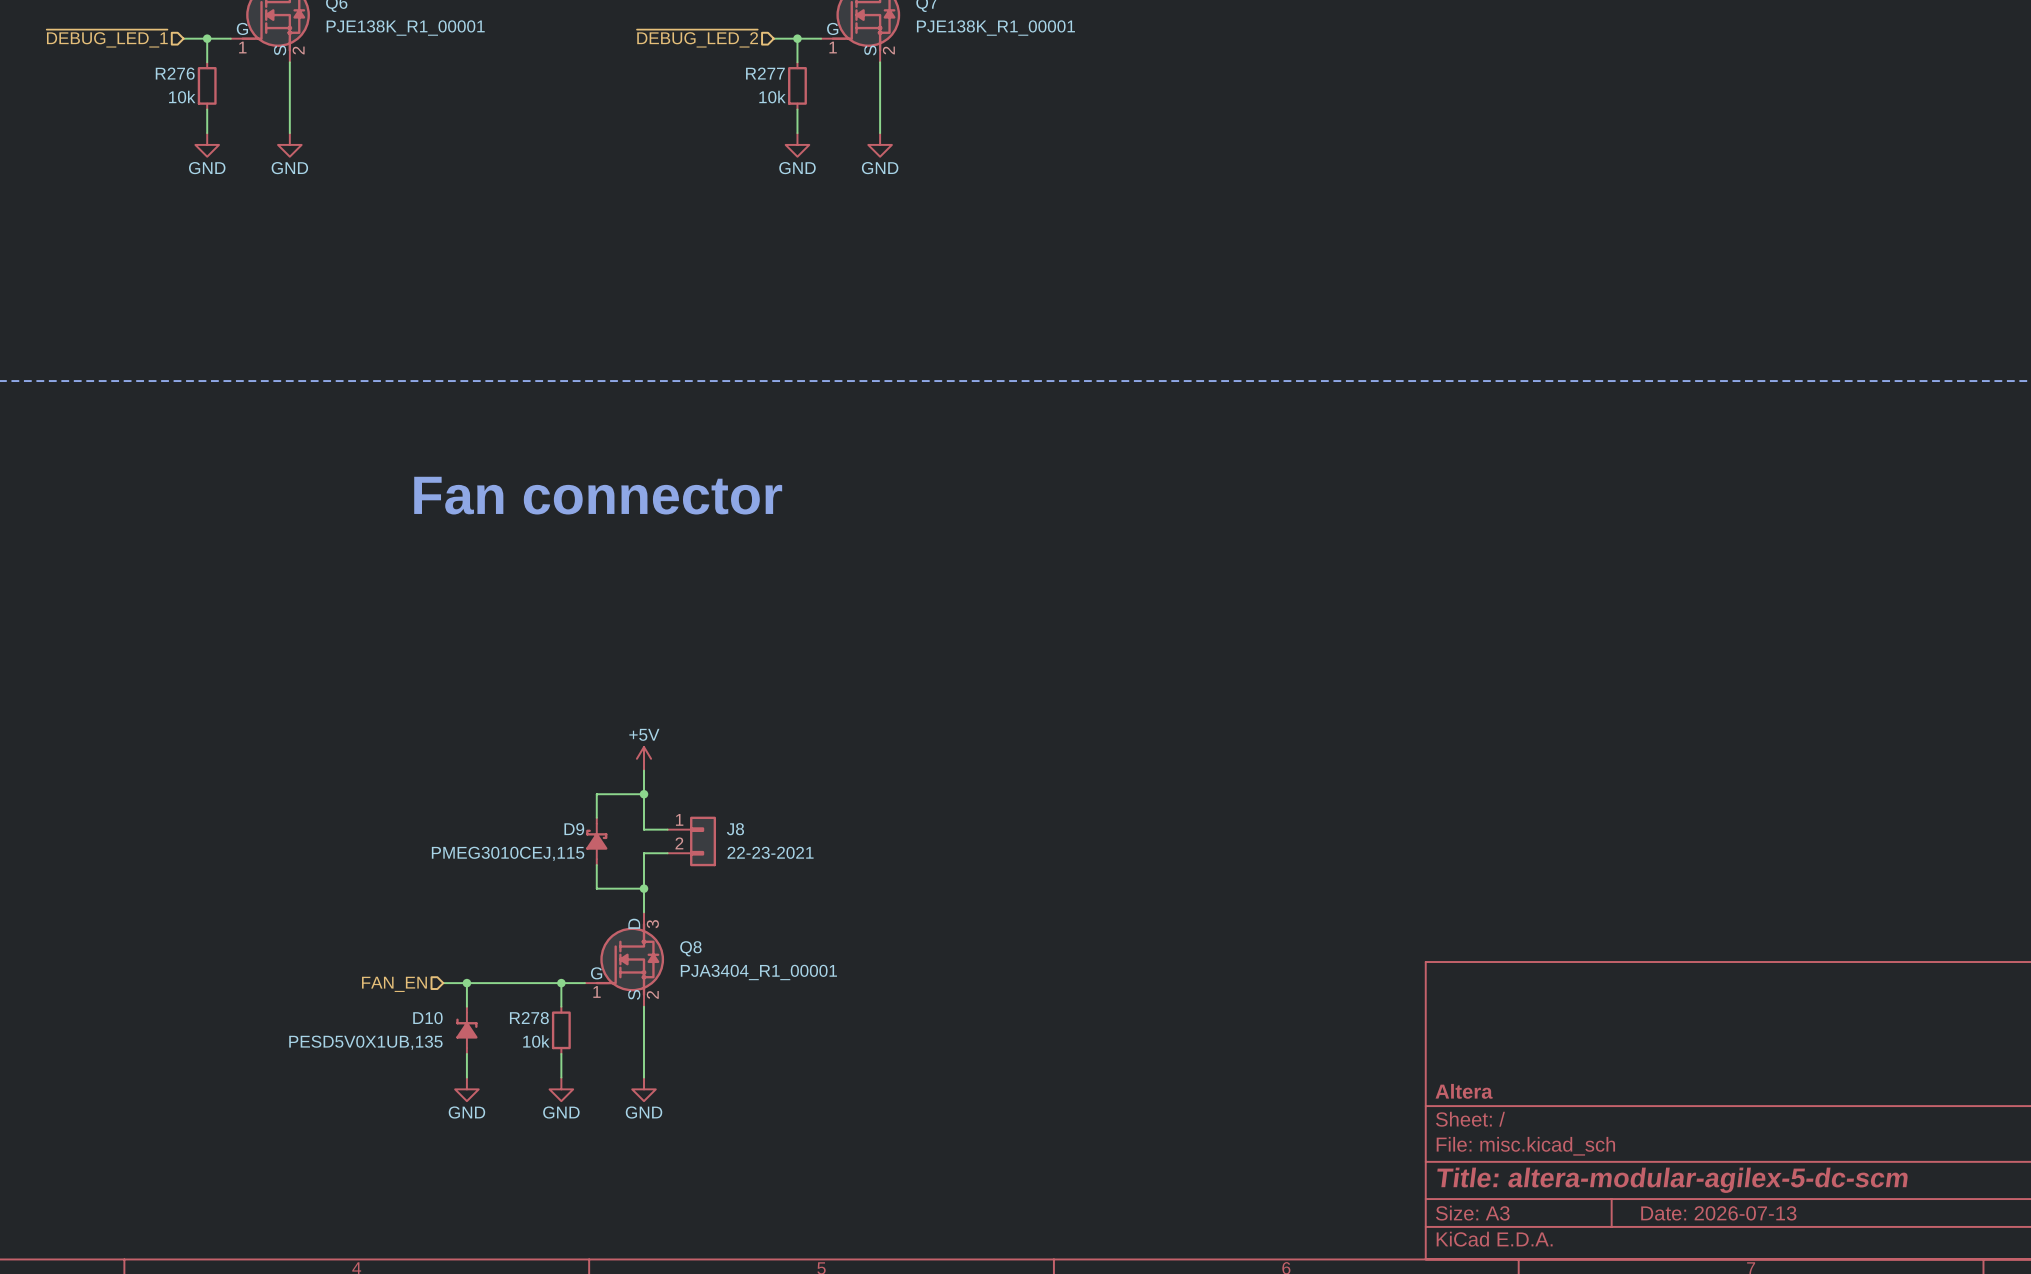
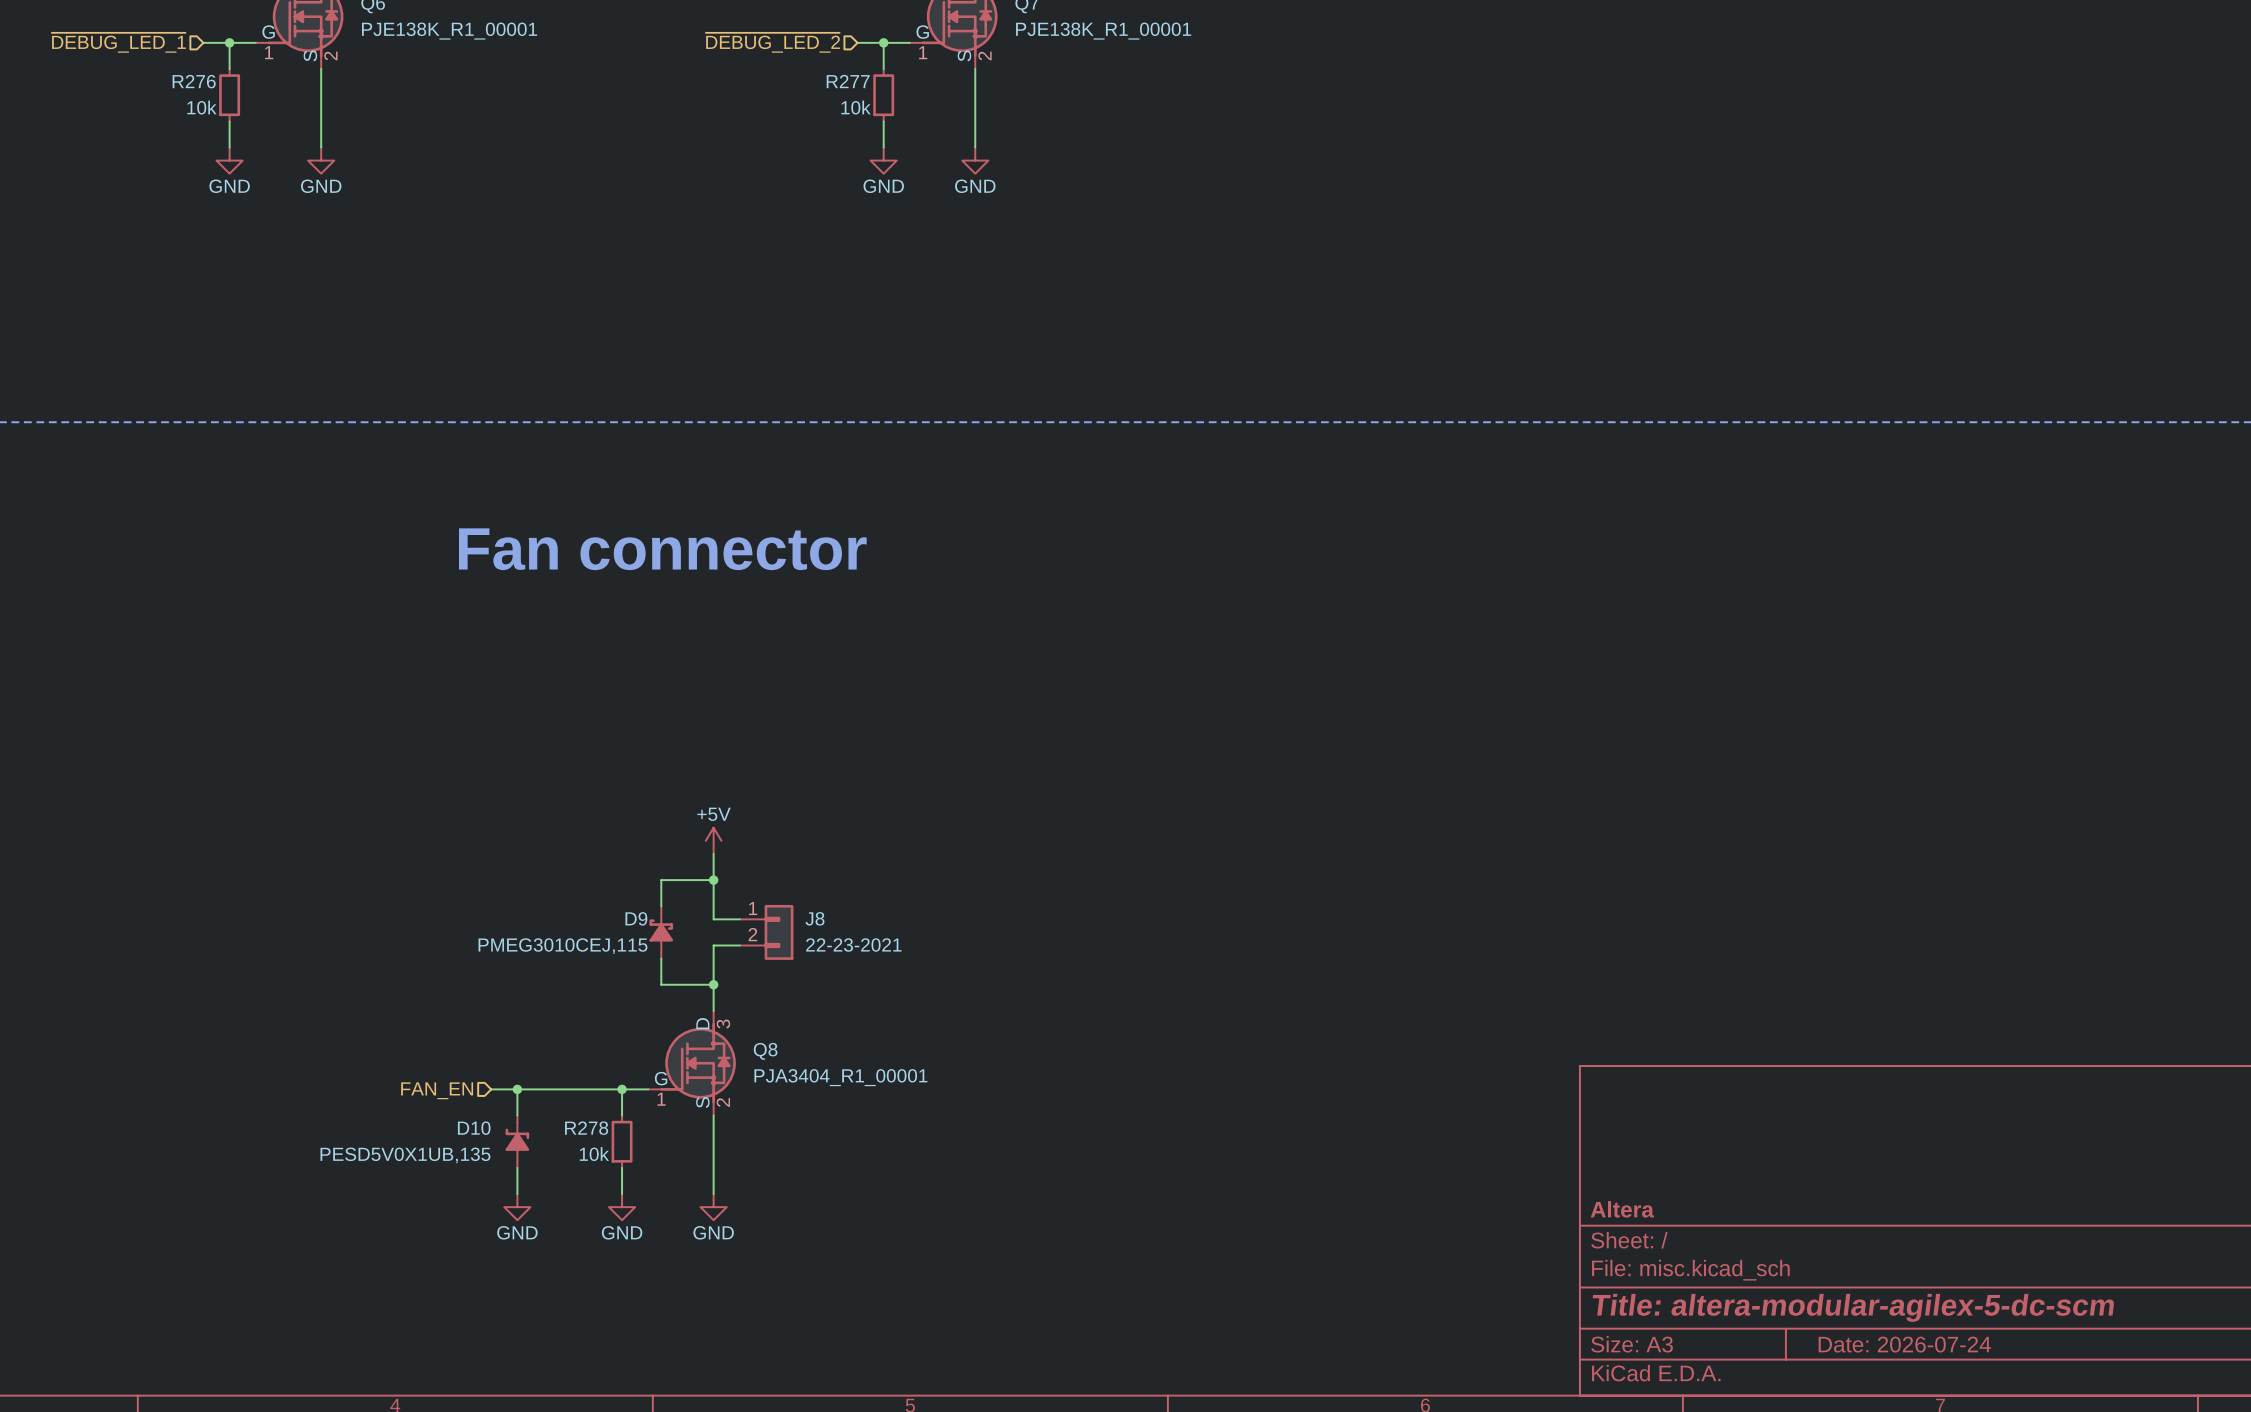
title block: Date: 2026-07-13 (1718, 1213) -> Date: 2026-07-24 (1904, 1344)

